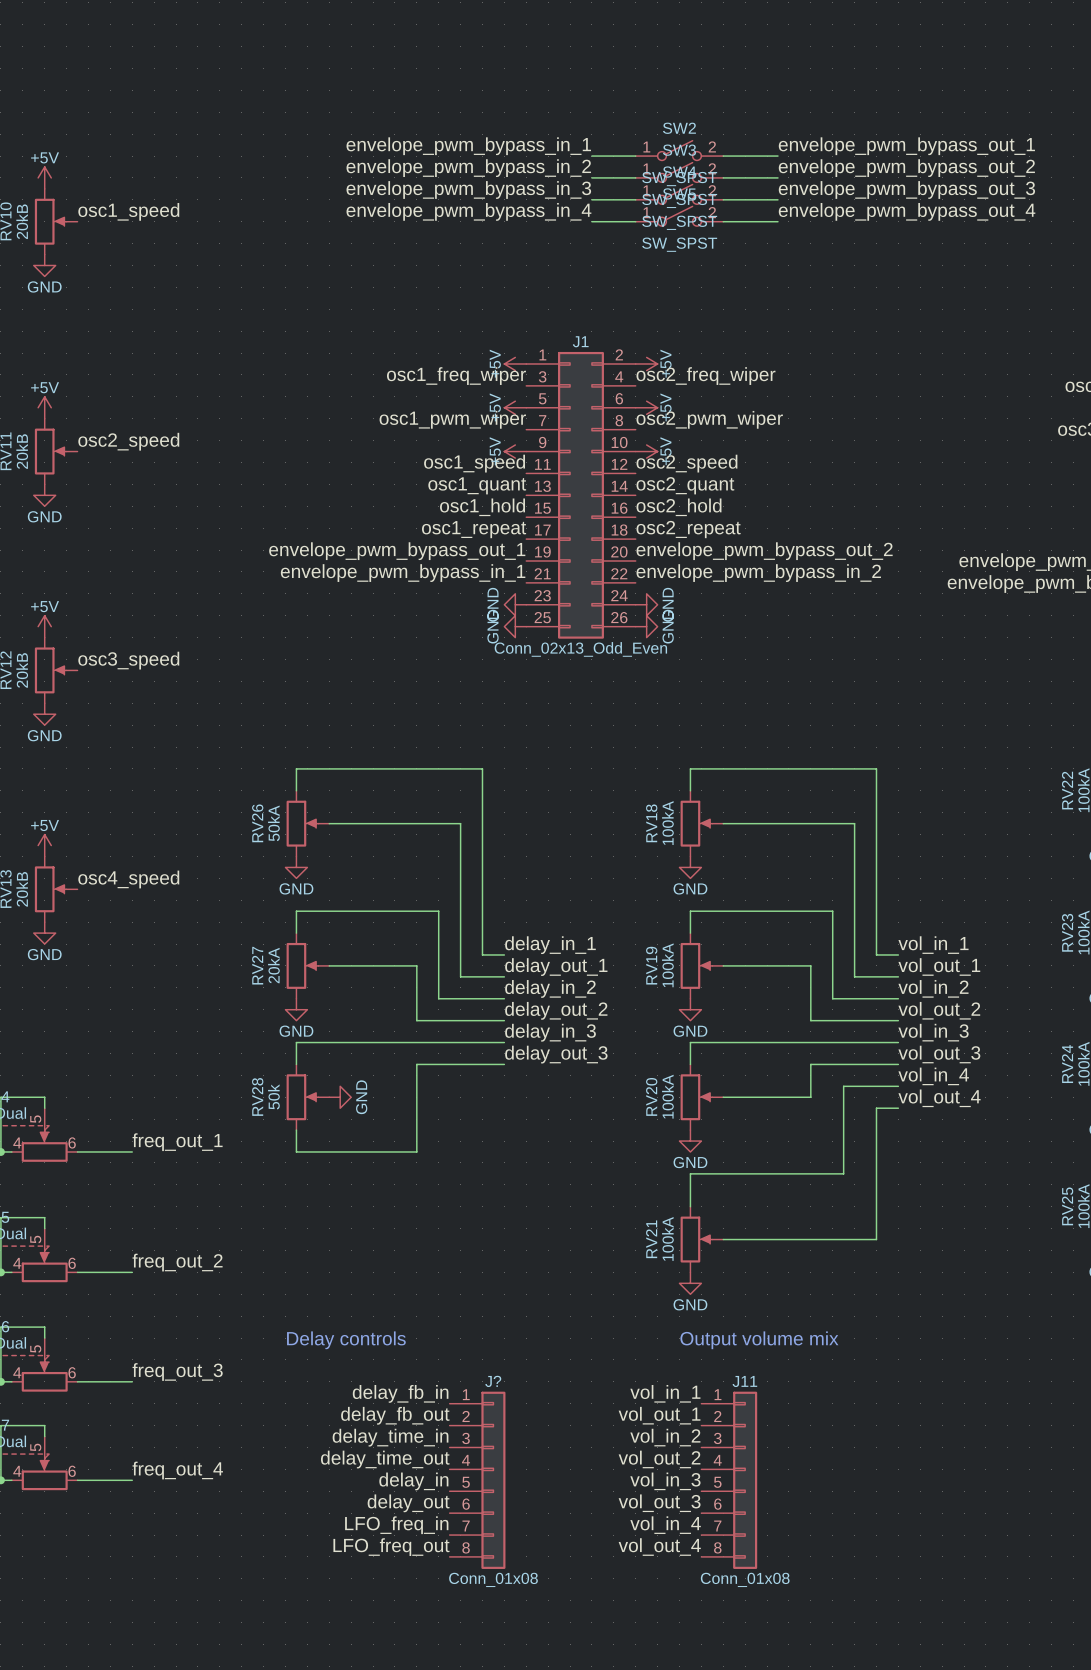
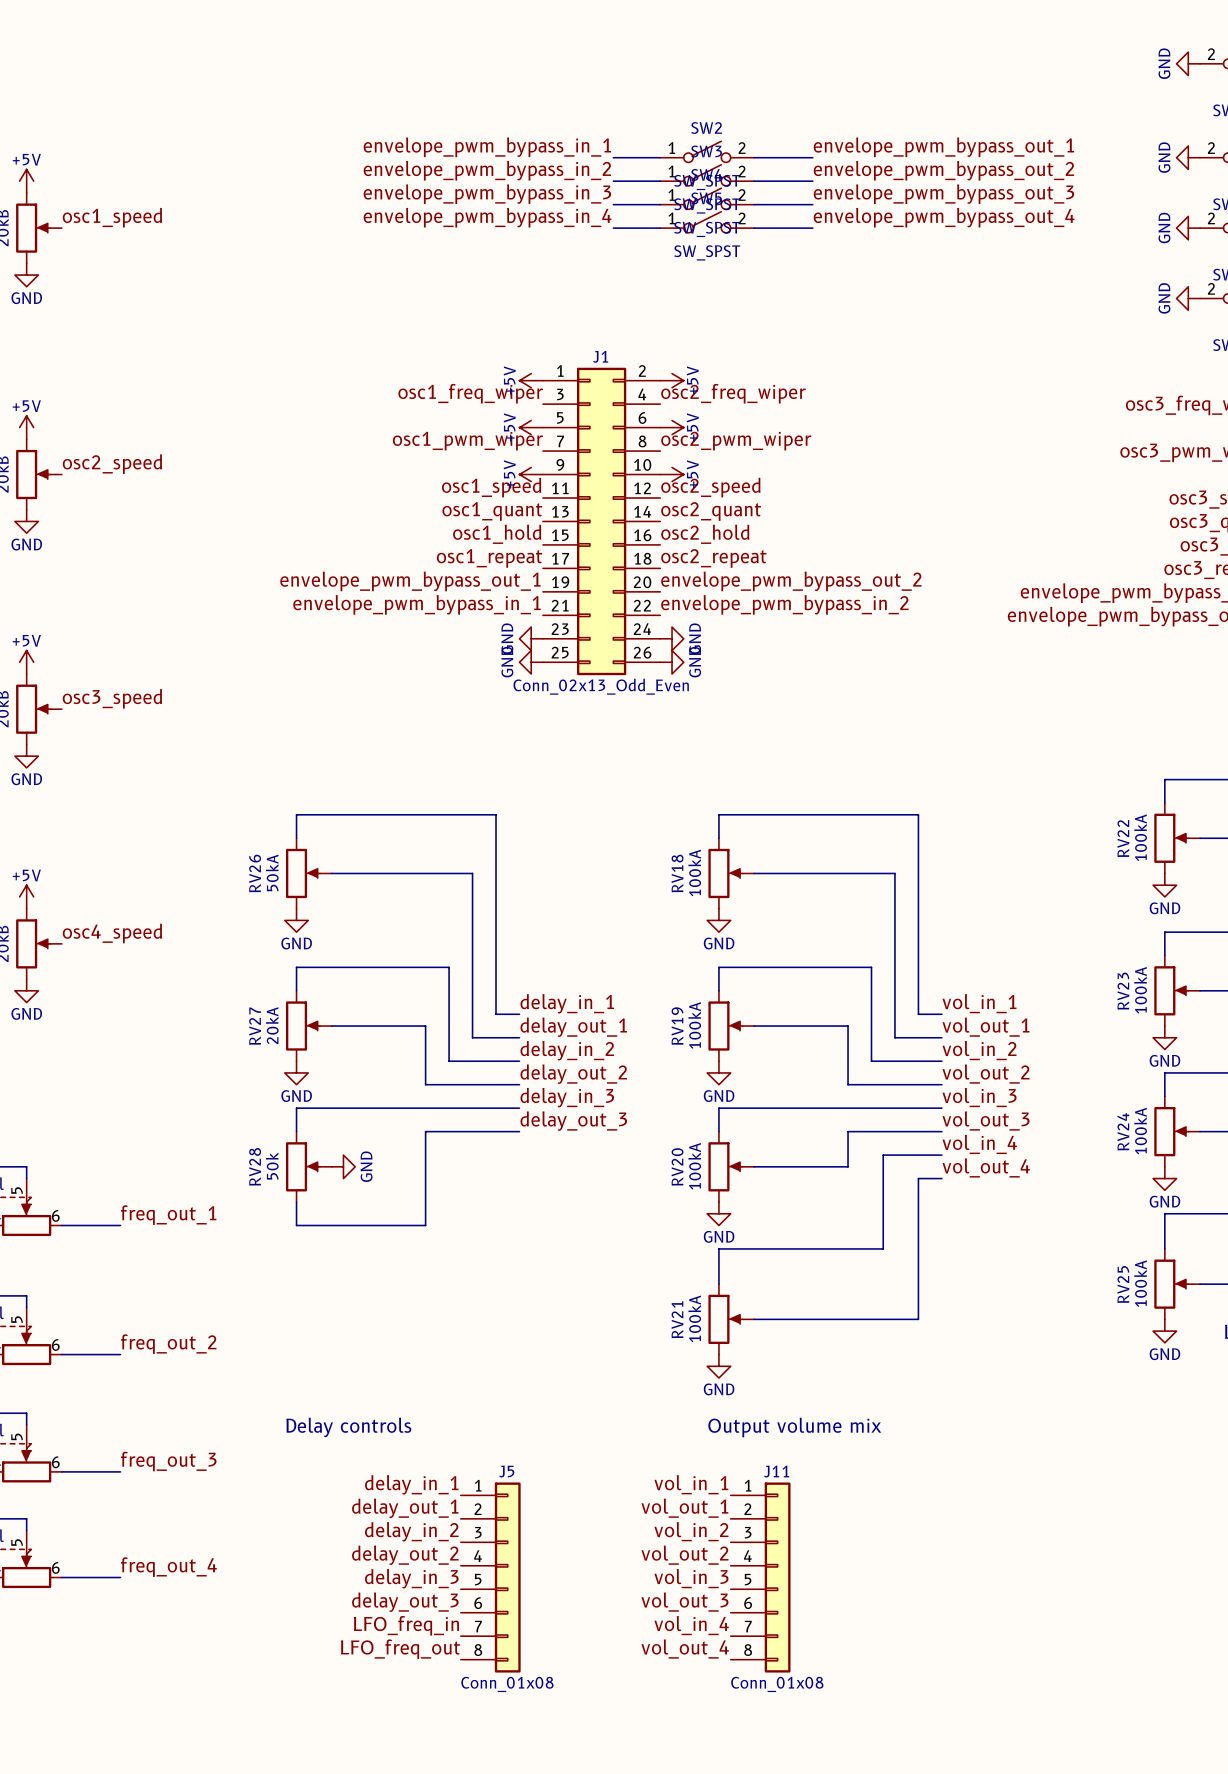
J? name: J? (493, 1381) -> J5 (506, 1471)
label: delay_fb_in (400, 1393) -> delay_in_1 (411, 1484)
label: delay_fb_out (395, 1415) -> delay_out_1 (405, 1508)
label: delay_time_in (390, 1437) -> delay_in_2 (411, 1531)
label: delay_time_out (385, 1459) -> delay_out_2 (405, 1555)
label: delay_in (413, 1481) -> delay_in_3 (411, 1578)
label: delay_out (408, 1503) -> delay_out_3 (405, 1602)

